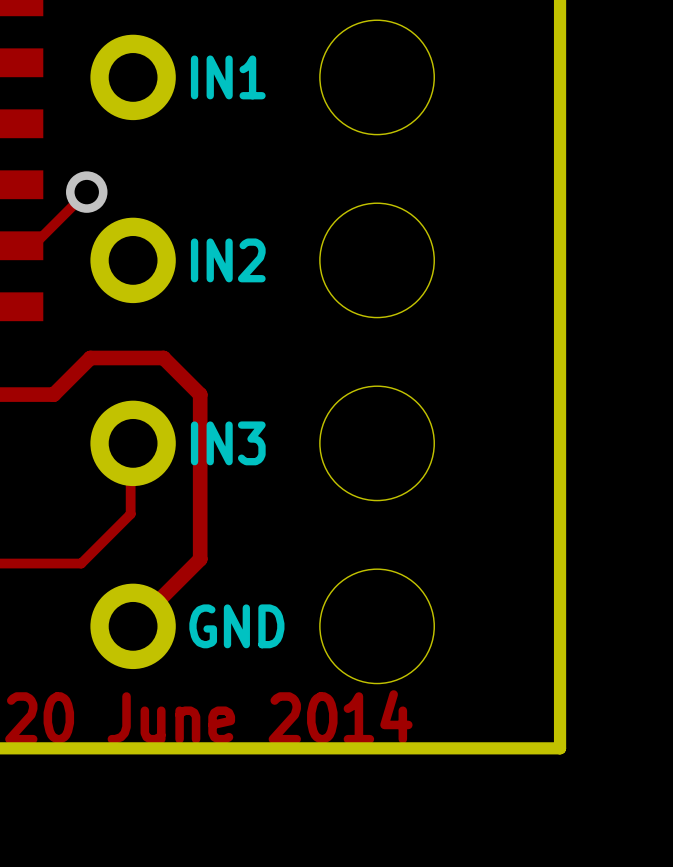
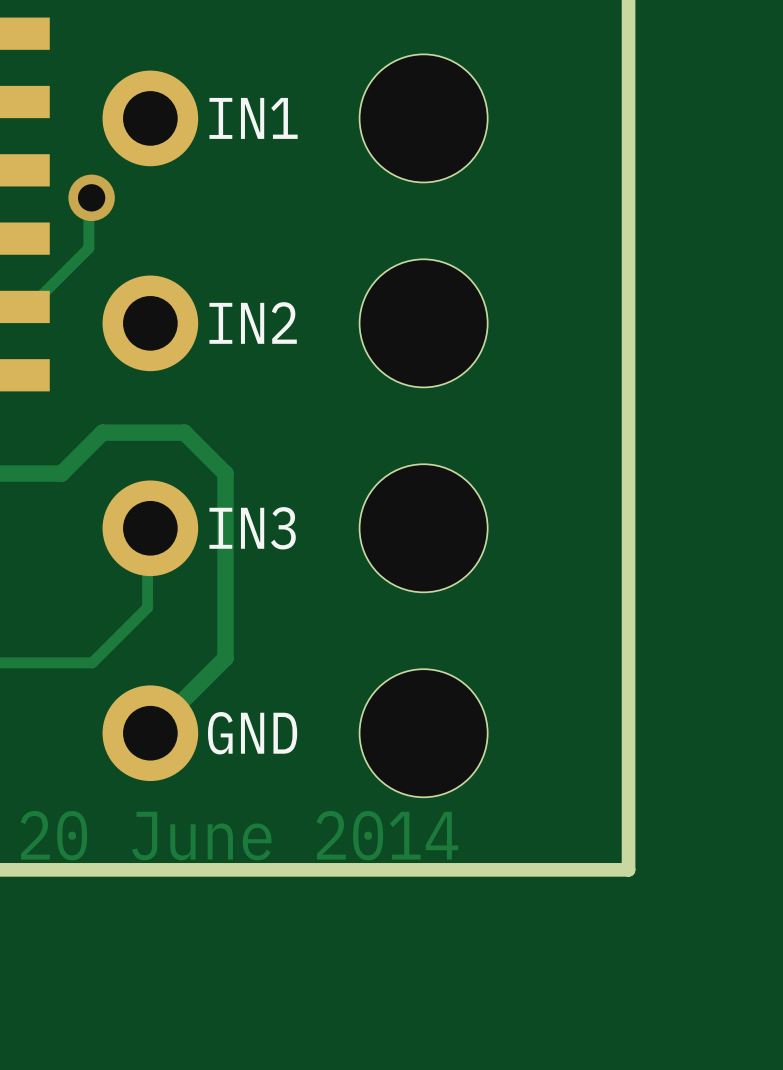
track: (86, 192) (33, 245) -> (91, 197) (88, 200) (88, 248) (38, 298) (38, 306)
via position: (86, 192) -> (91, 197)

